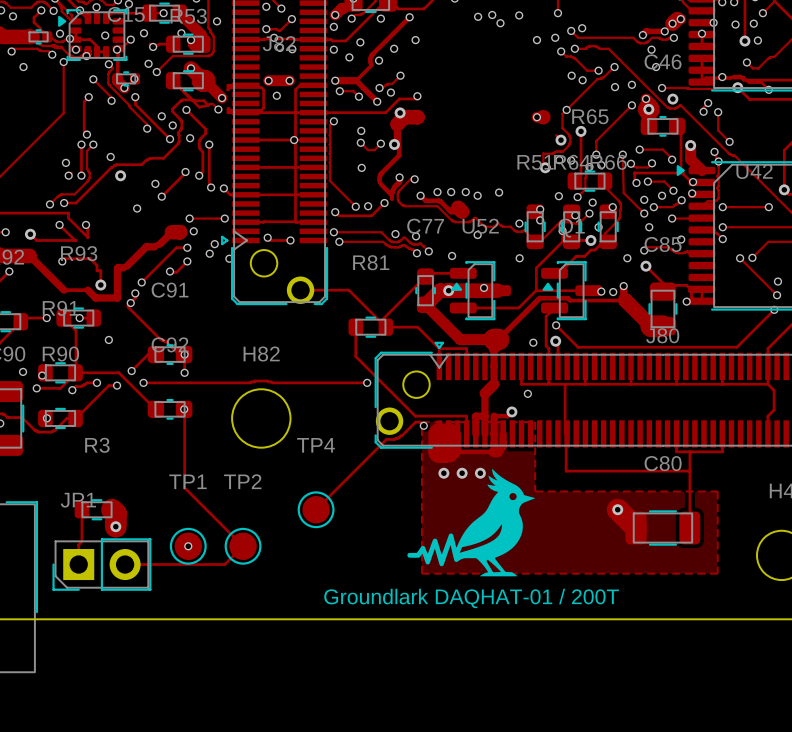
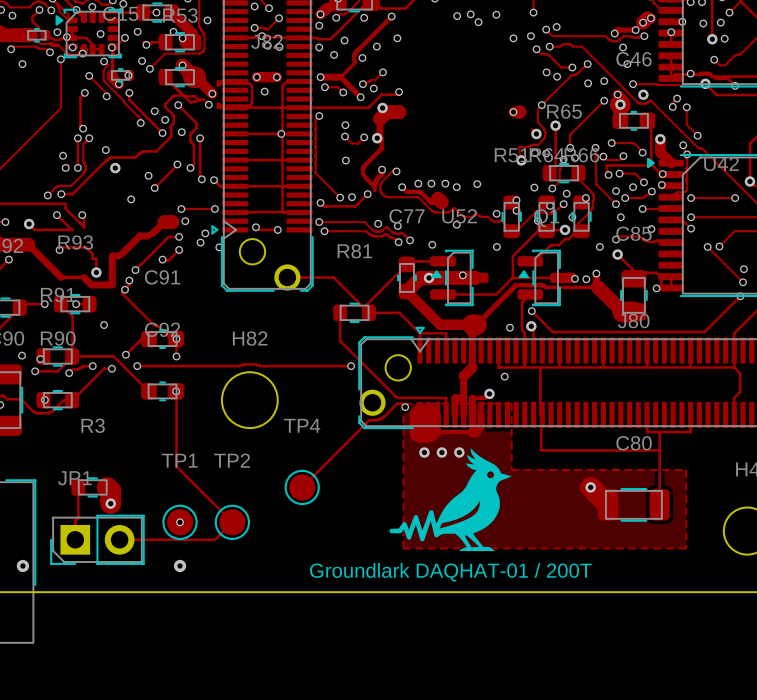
via: none -> (22, 565)
via: none -> (180, 565)

